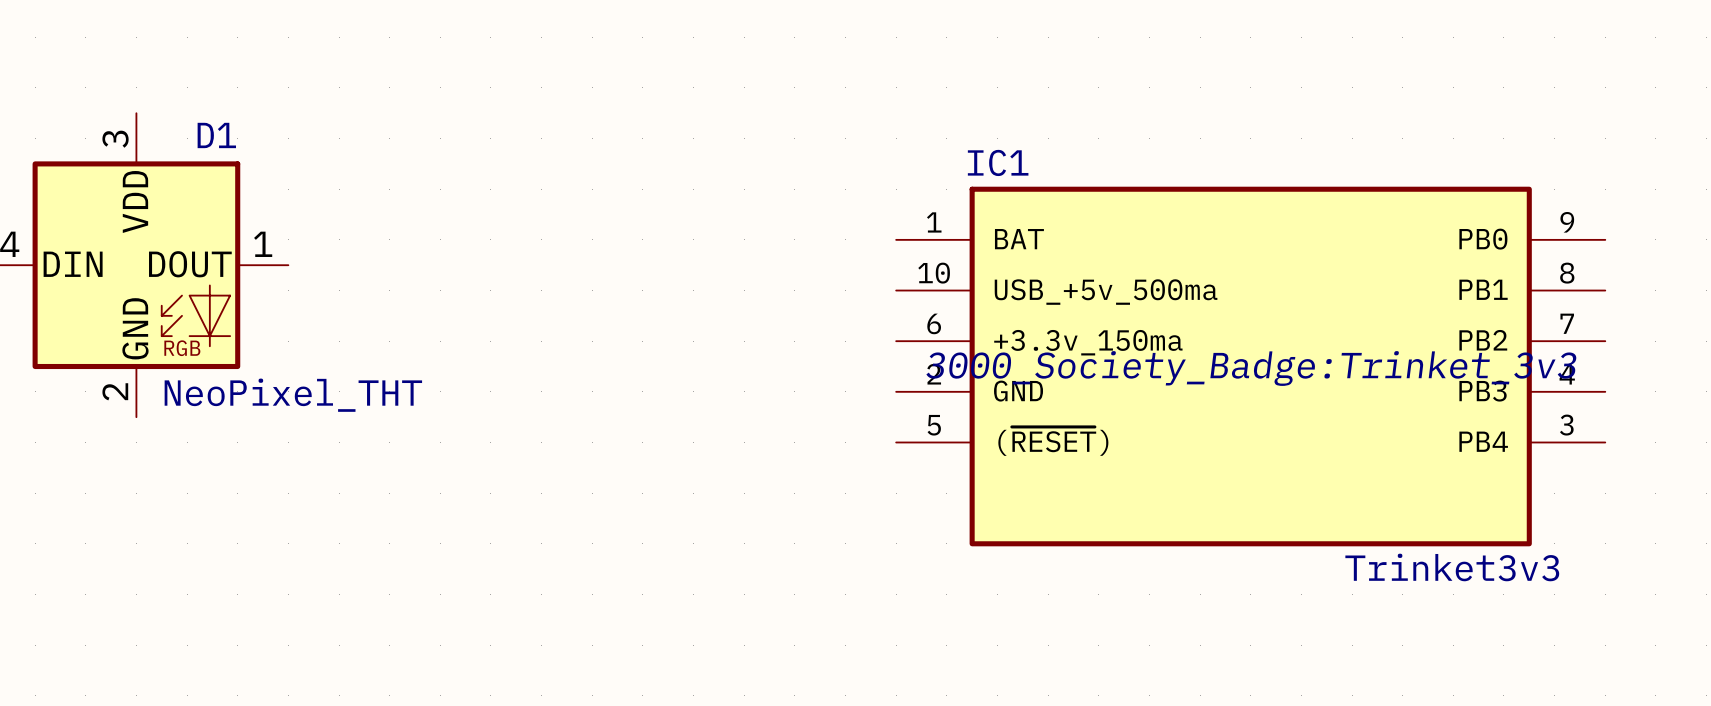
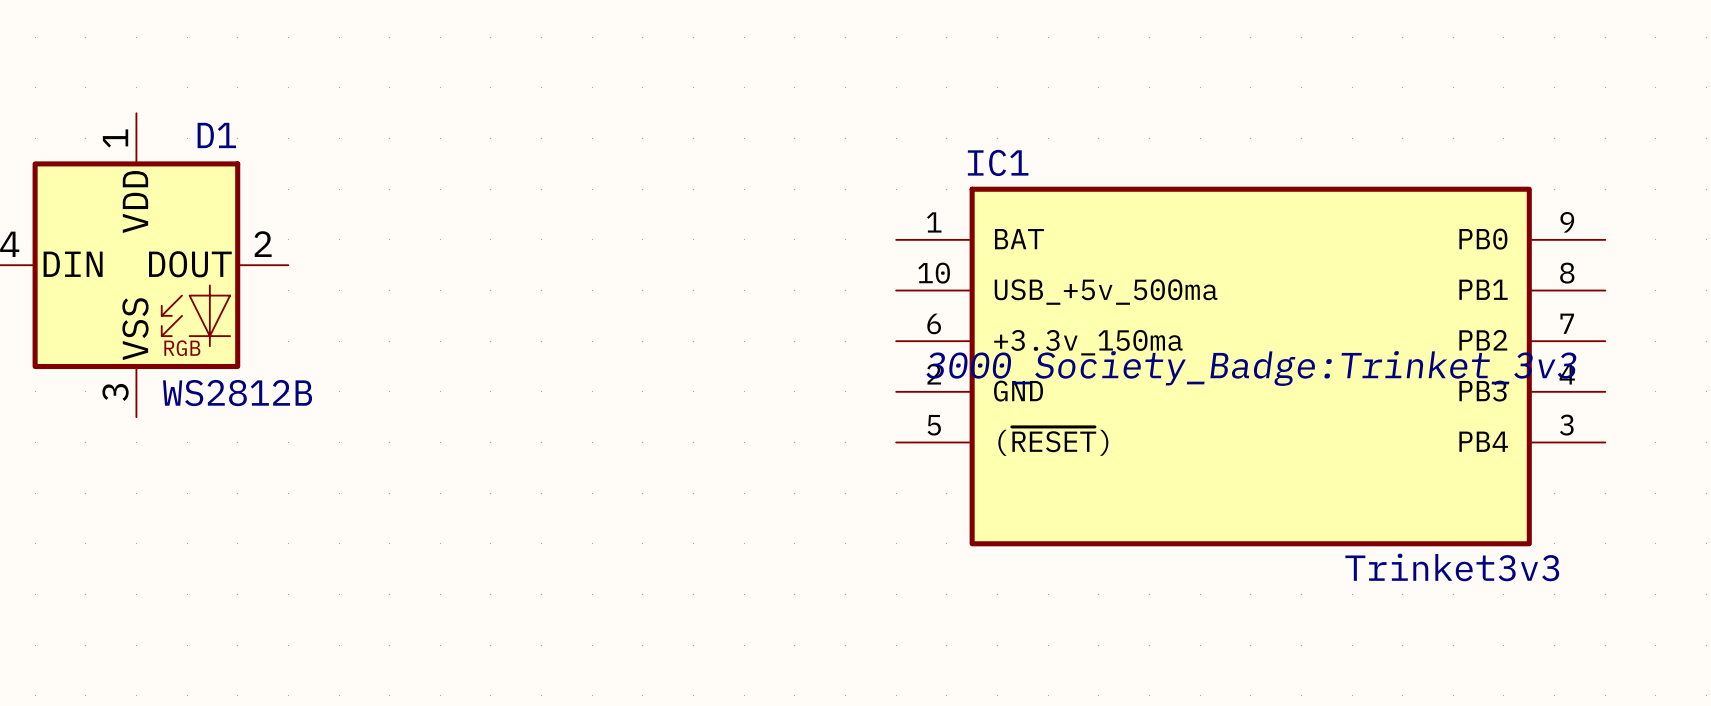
D1 pin number: 3 (115, 139) -> 1 (115, 138)
D1 pin number: 1 (263, 244) -> 2 (263, 244)
D1 pin name: GND (135, 328) -> VSS (135, 329)
D1 pin number: 2 (115, 391) -> 3 (115, 392)
D1 value: NeoPixel_THT (293, 395) -> WS2812B (237, 393)

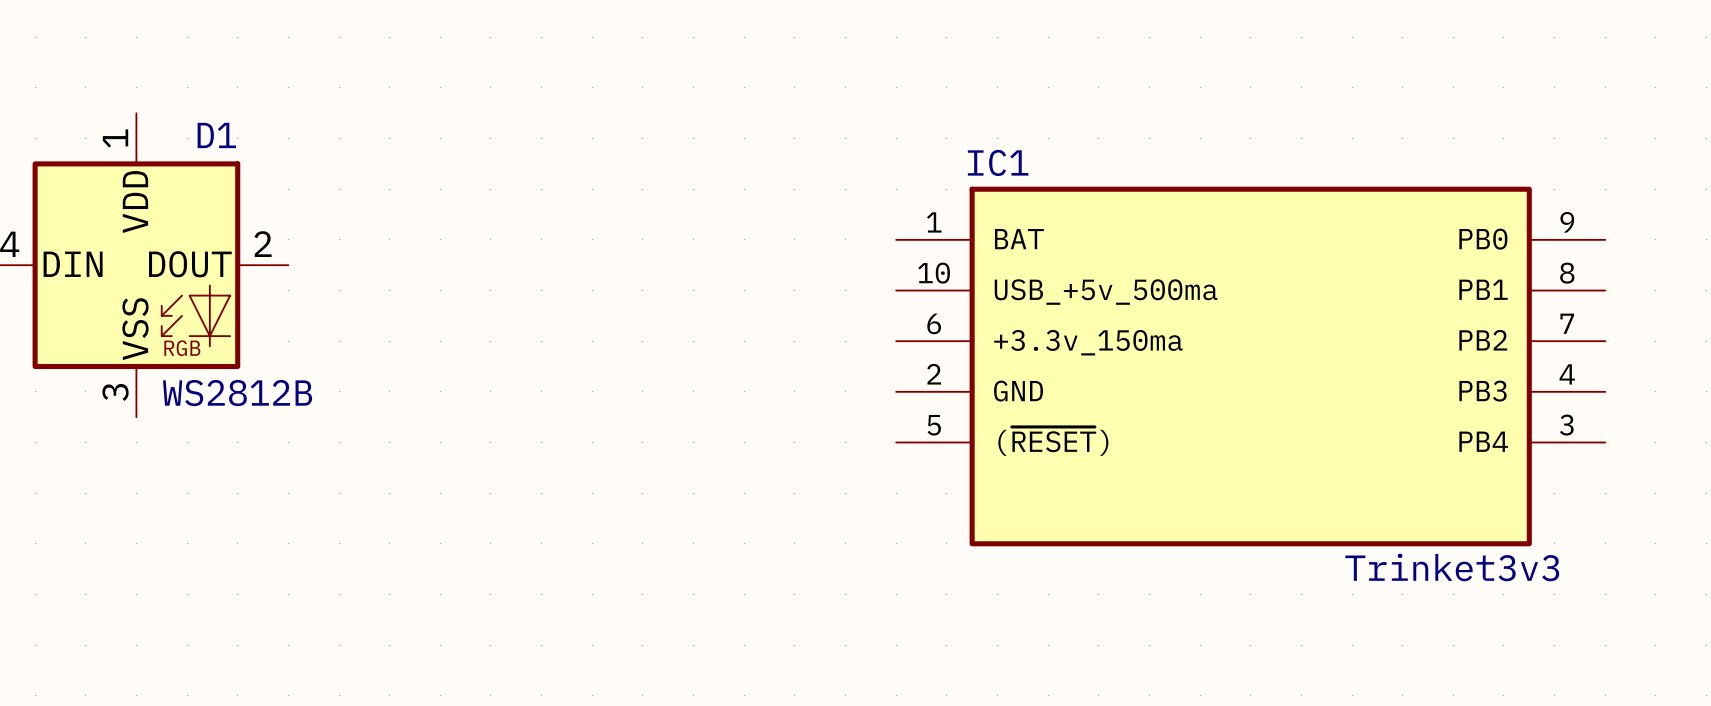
IC1 text: 3000_Society_Badge:Trinket_3v3 (1251, 368) -> none

